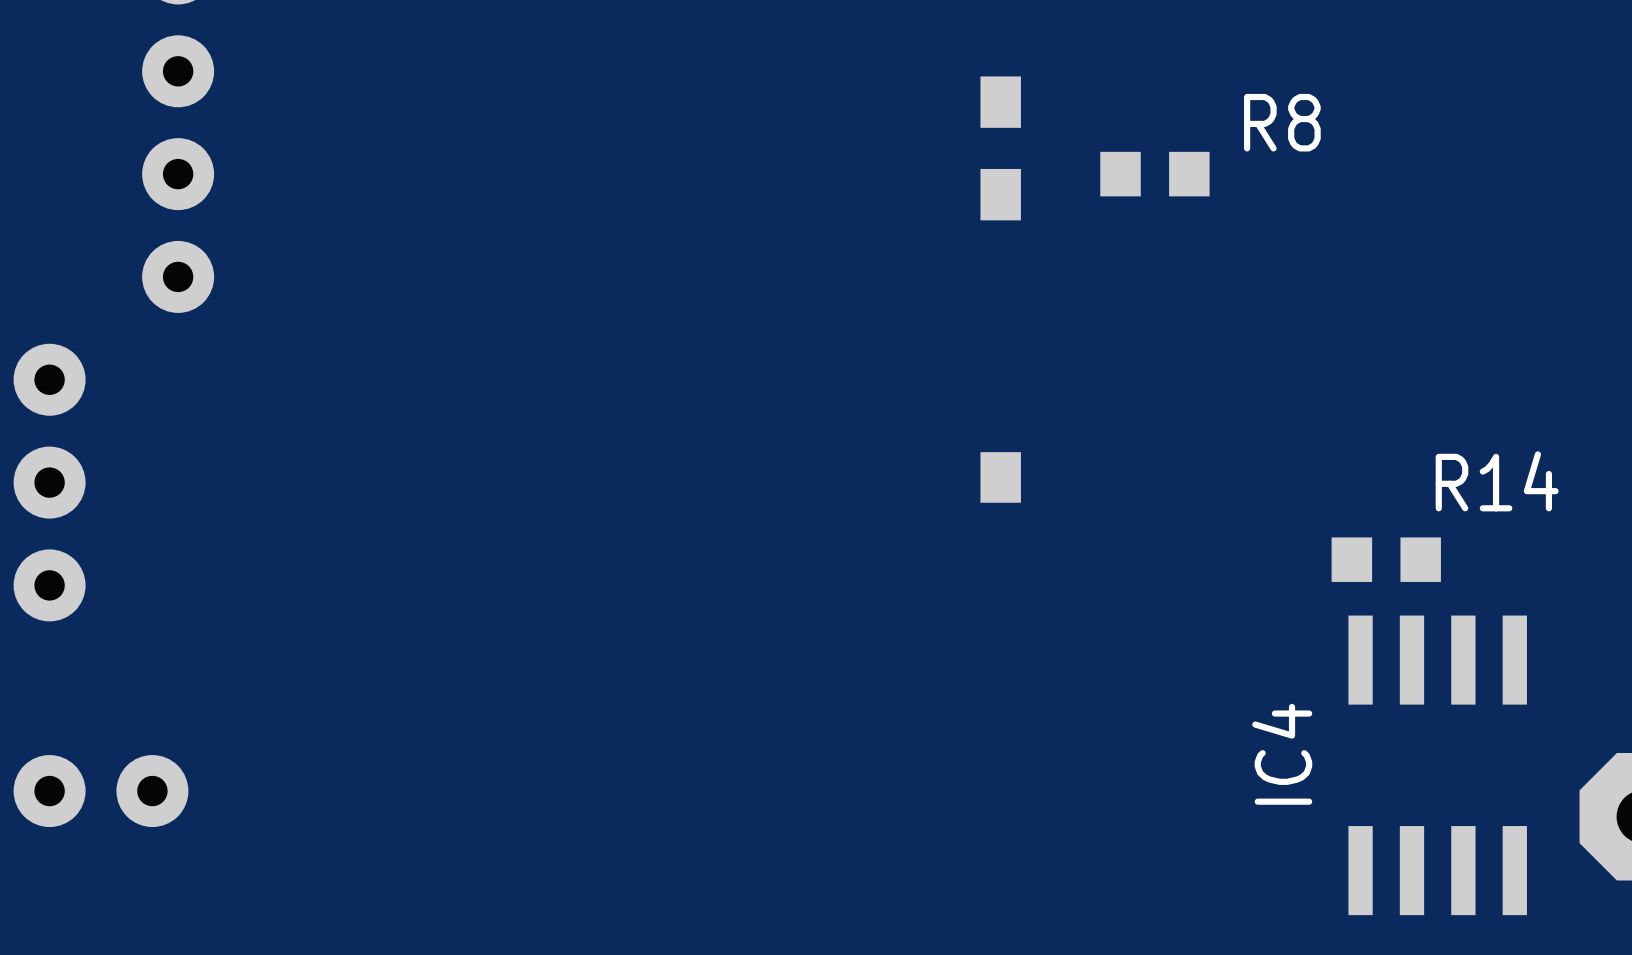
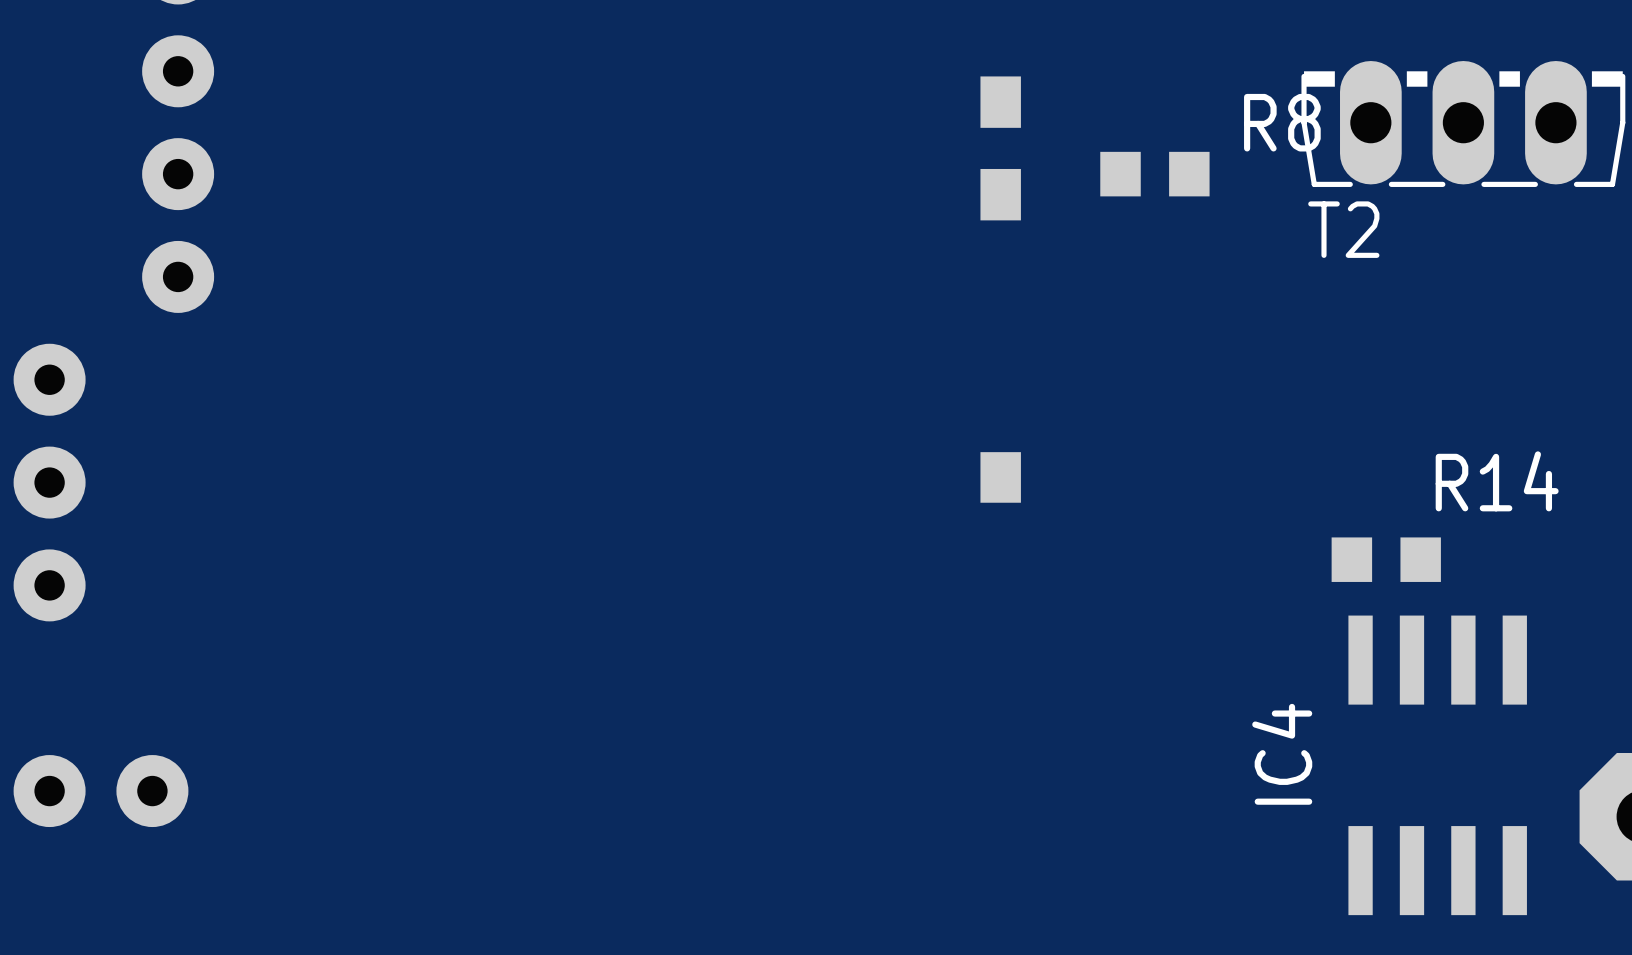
T2: none -> (1463, 123)

